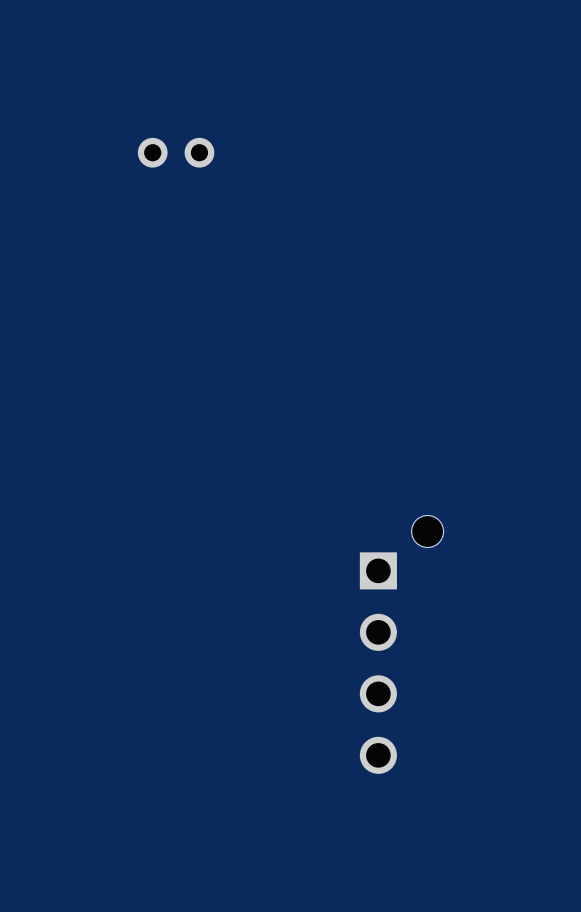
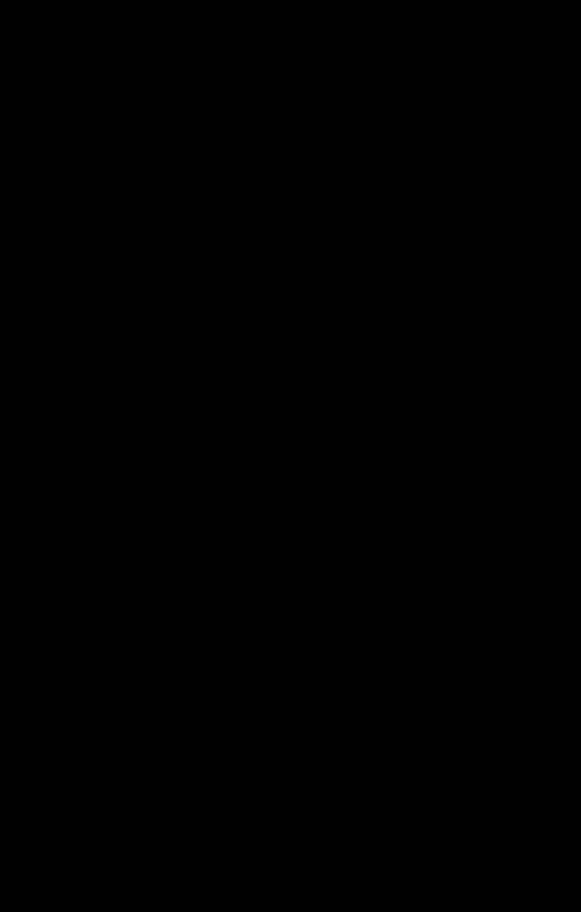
part: (176, 152) -> none
part: (401, 644) -> none

